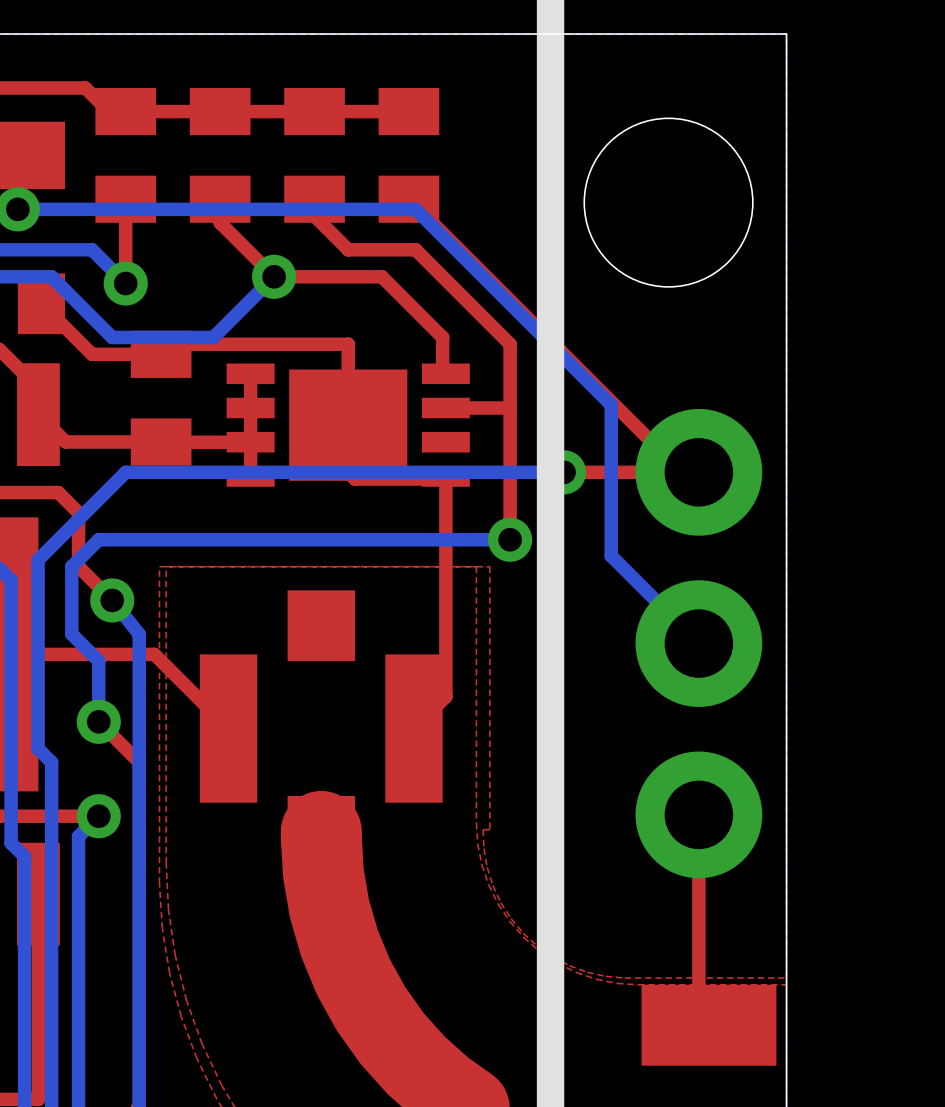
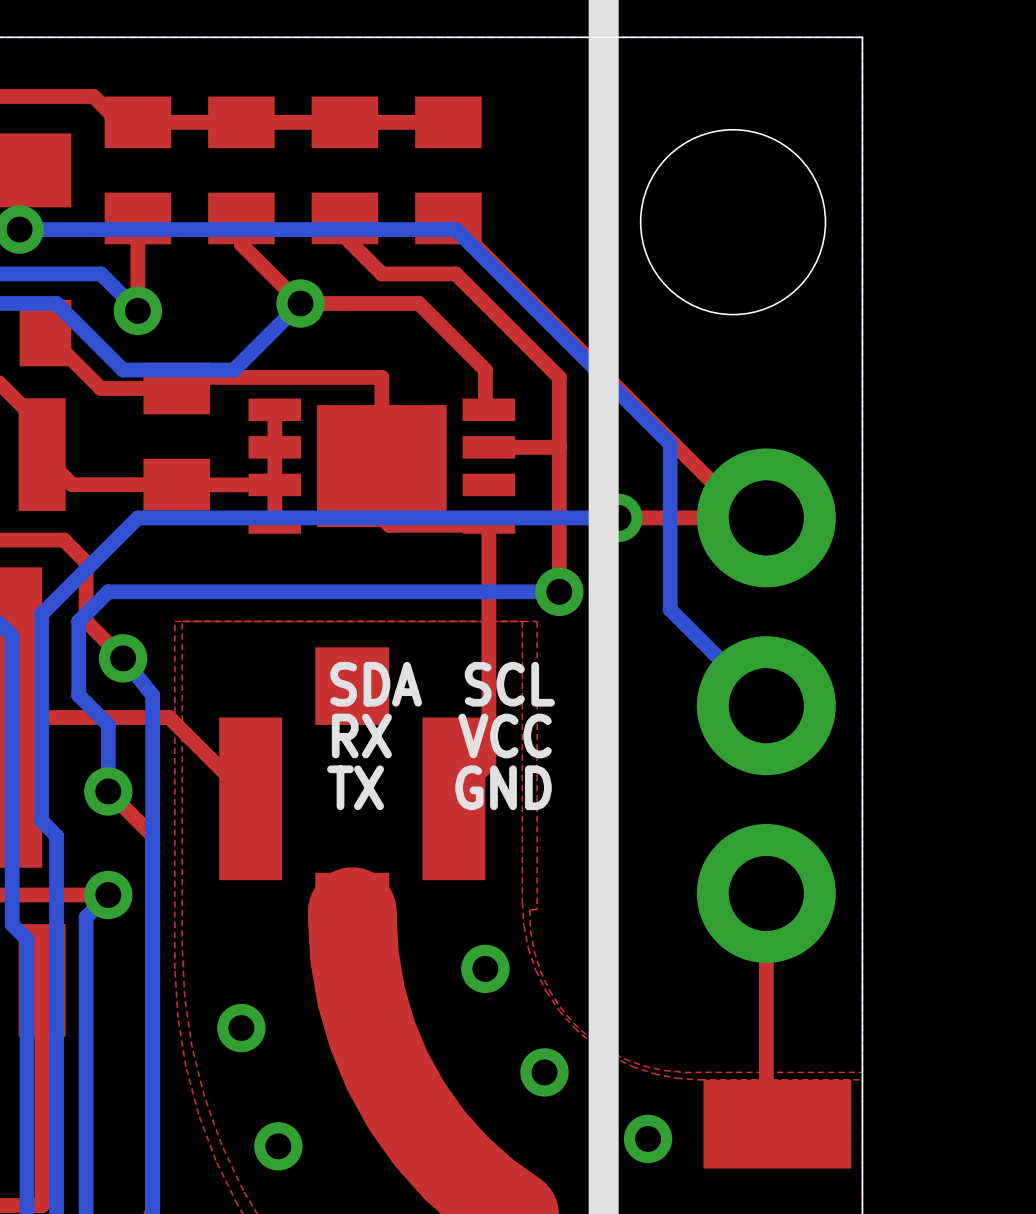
text: none -> SDA (376, 684)
text: none -> SCL (509, 684)
text: none -> RX (361, 736)
text: none -> VCC (505, 736)
text: none -> TX (355, 787)
text: none -> GND (503, 787)
via: none -> (485, 968)
via: none -> (241, 1028)
via: none -> (544, 1072)
via: none -> (648, 1138)
via: none -> (278, 1146)

